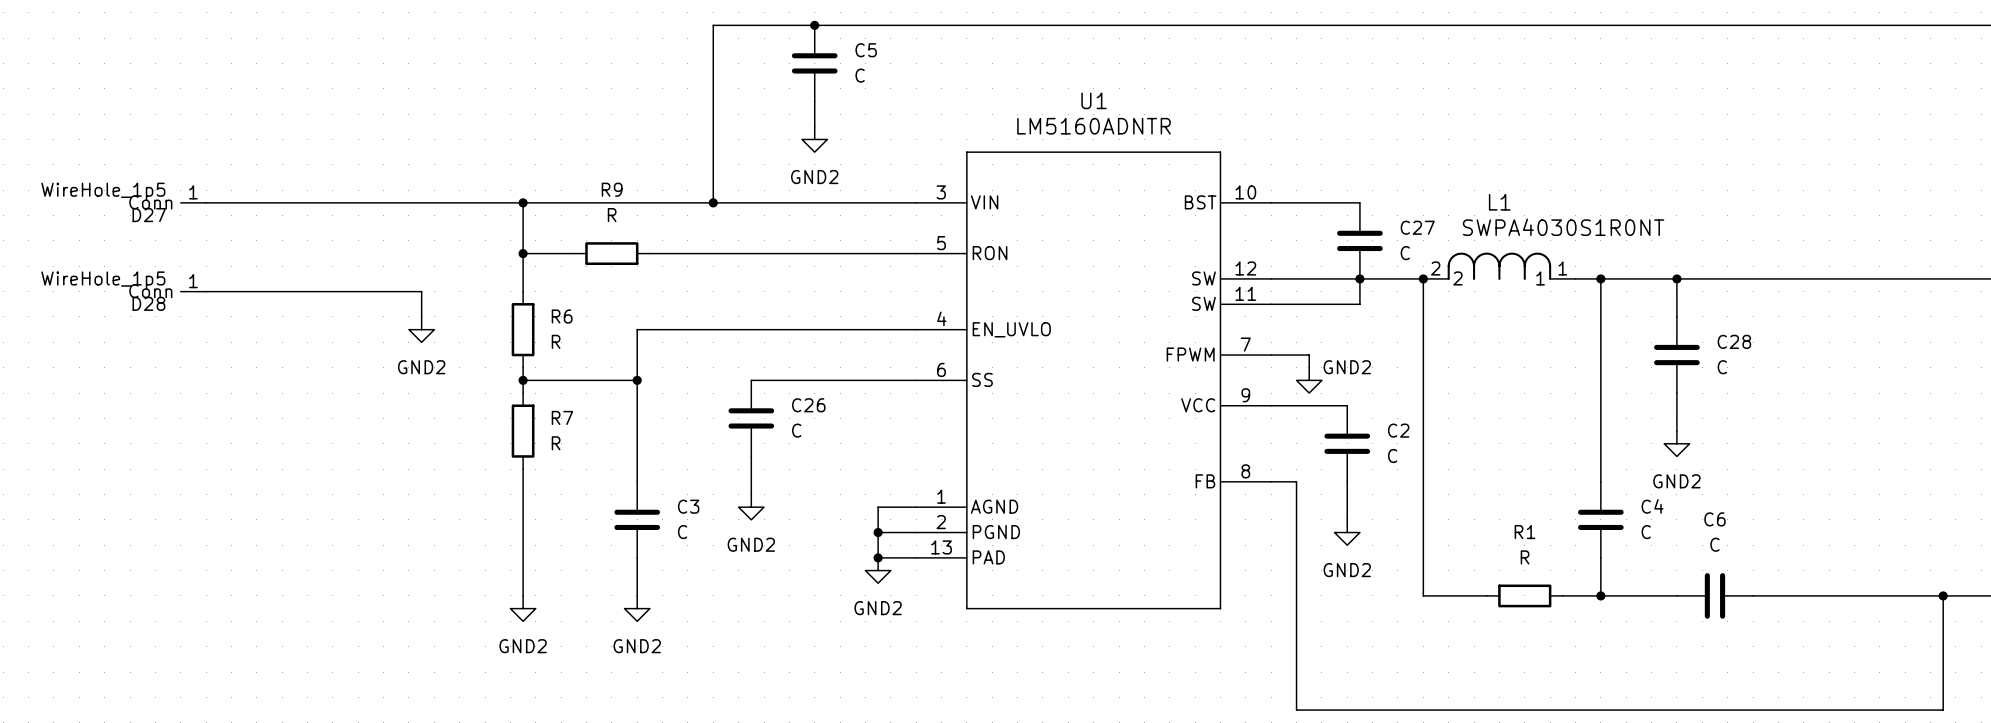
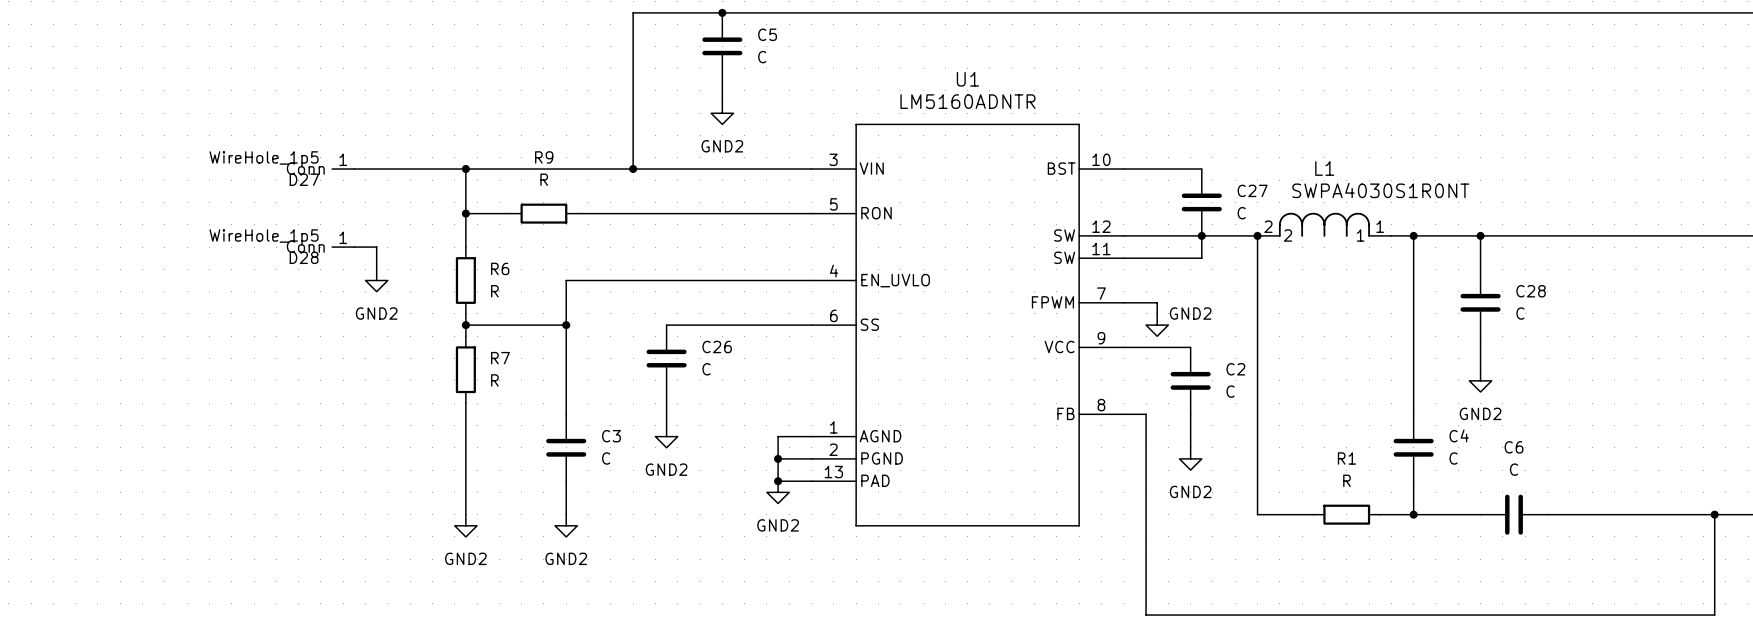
D27 position: (193, 202) -> (343, 169)
wire: (206, 202) (396, 202) -> none
D28 position: (193, 291) -> (343, 247)
wire: (206, 291) (396, 291) -> none

